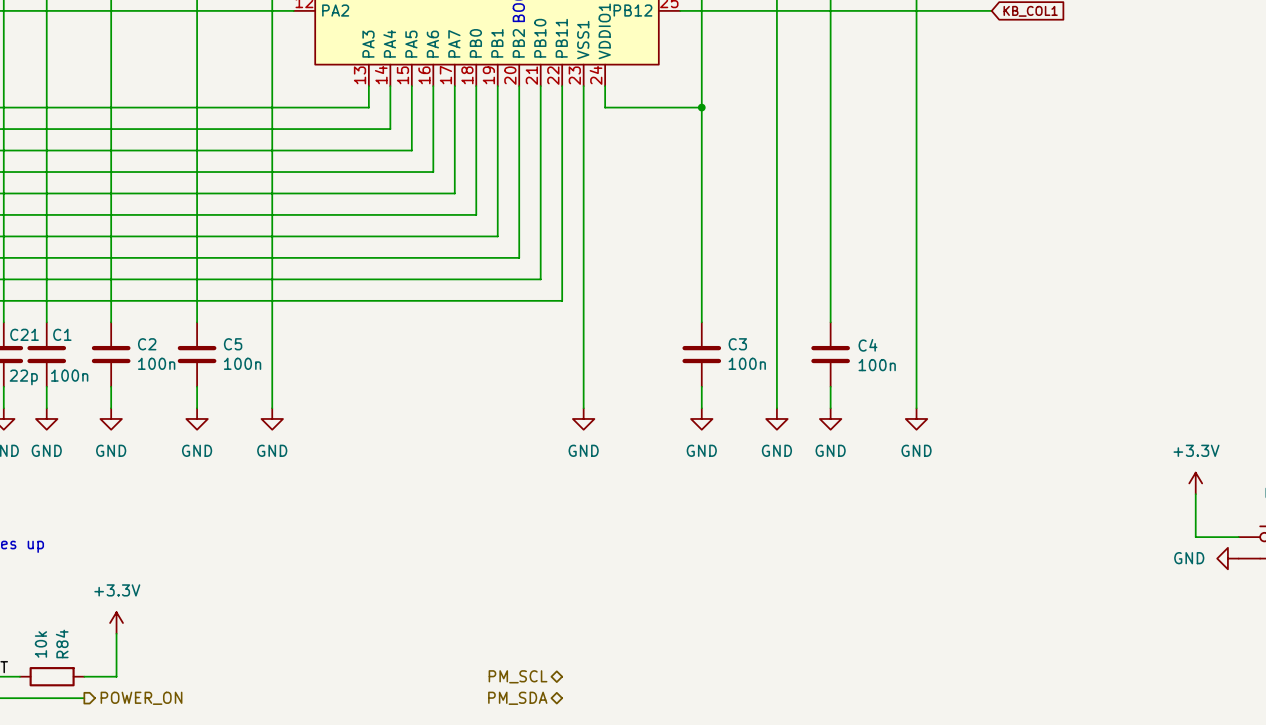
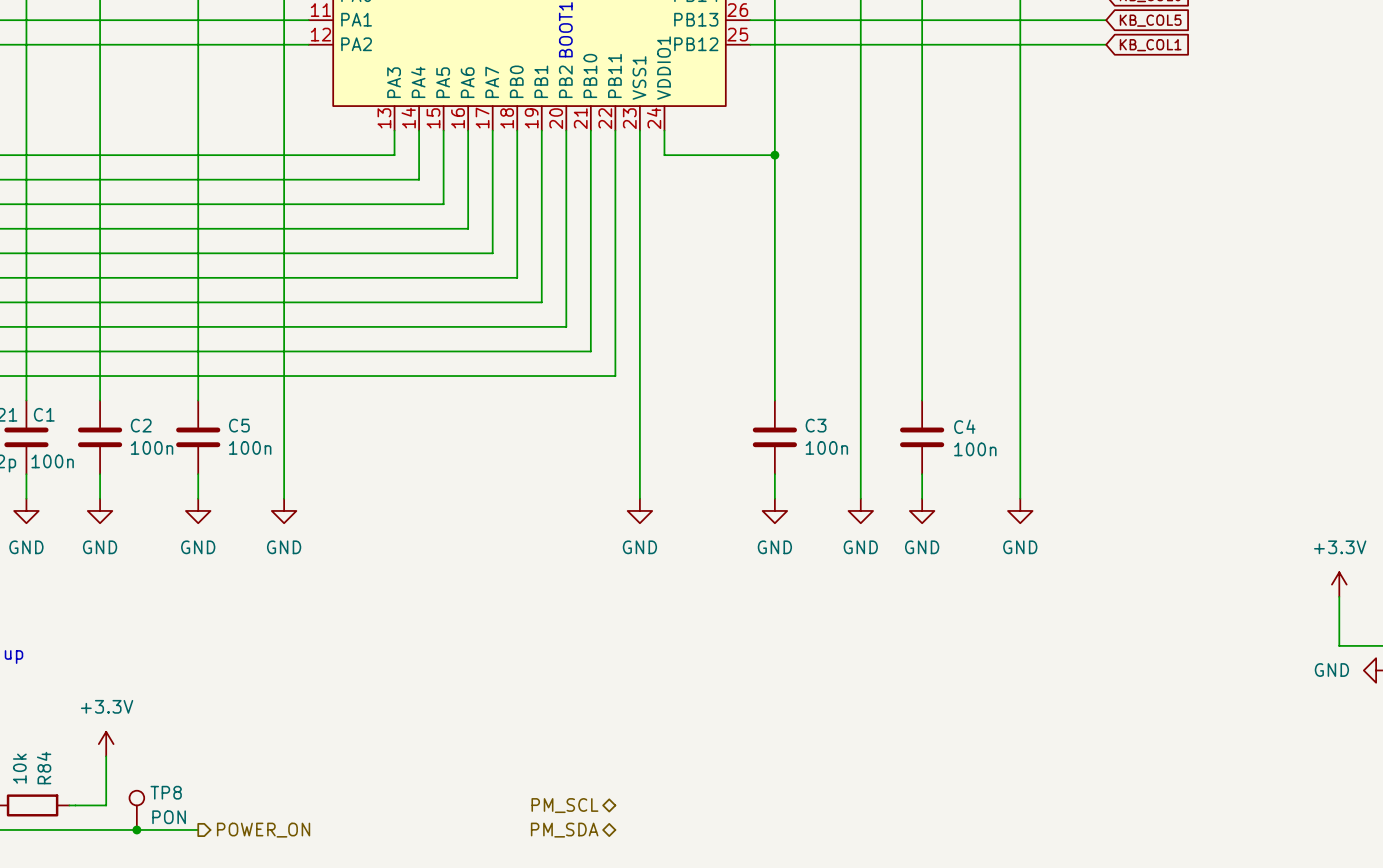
TP8: none -> PON (136, 810)
wire: none -> (69, 829) (198, 829)
hierarchical label position: POWER_ON (141, 698) -> POWER_ON (263, 830)
junction: none -> (136, 829)

